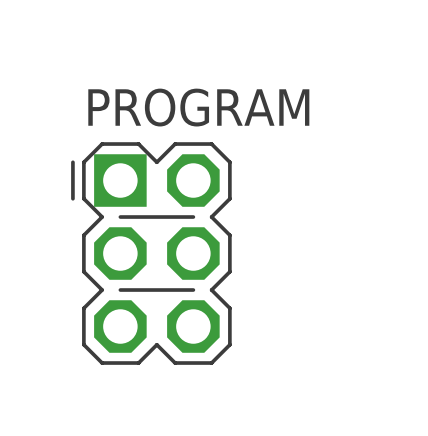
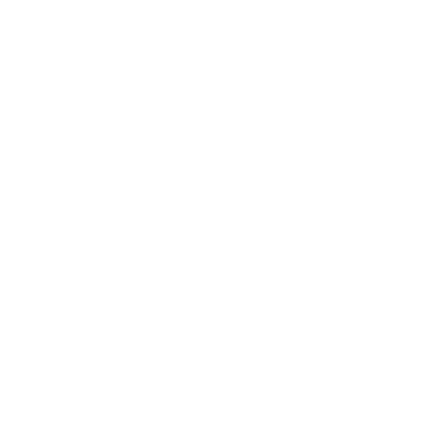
PROGRAM: (151, 253) -> none

